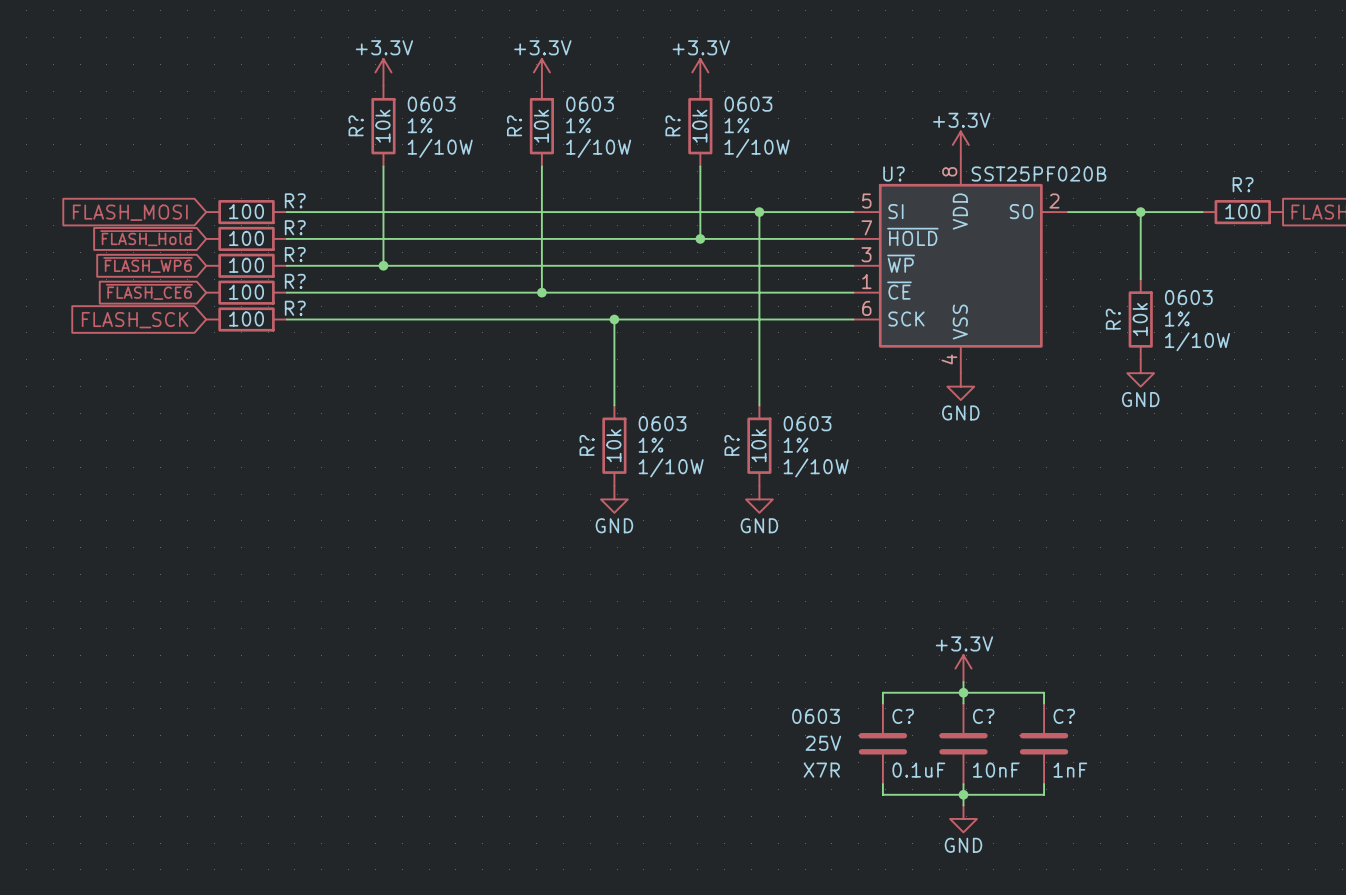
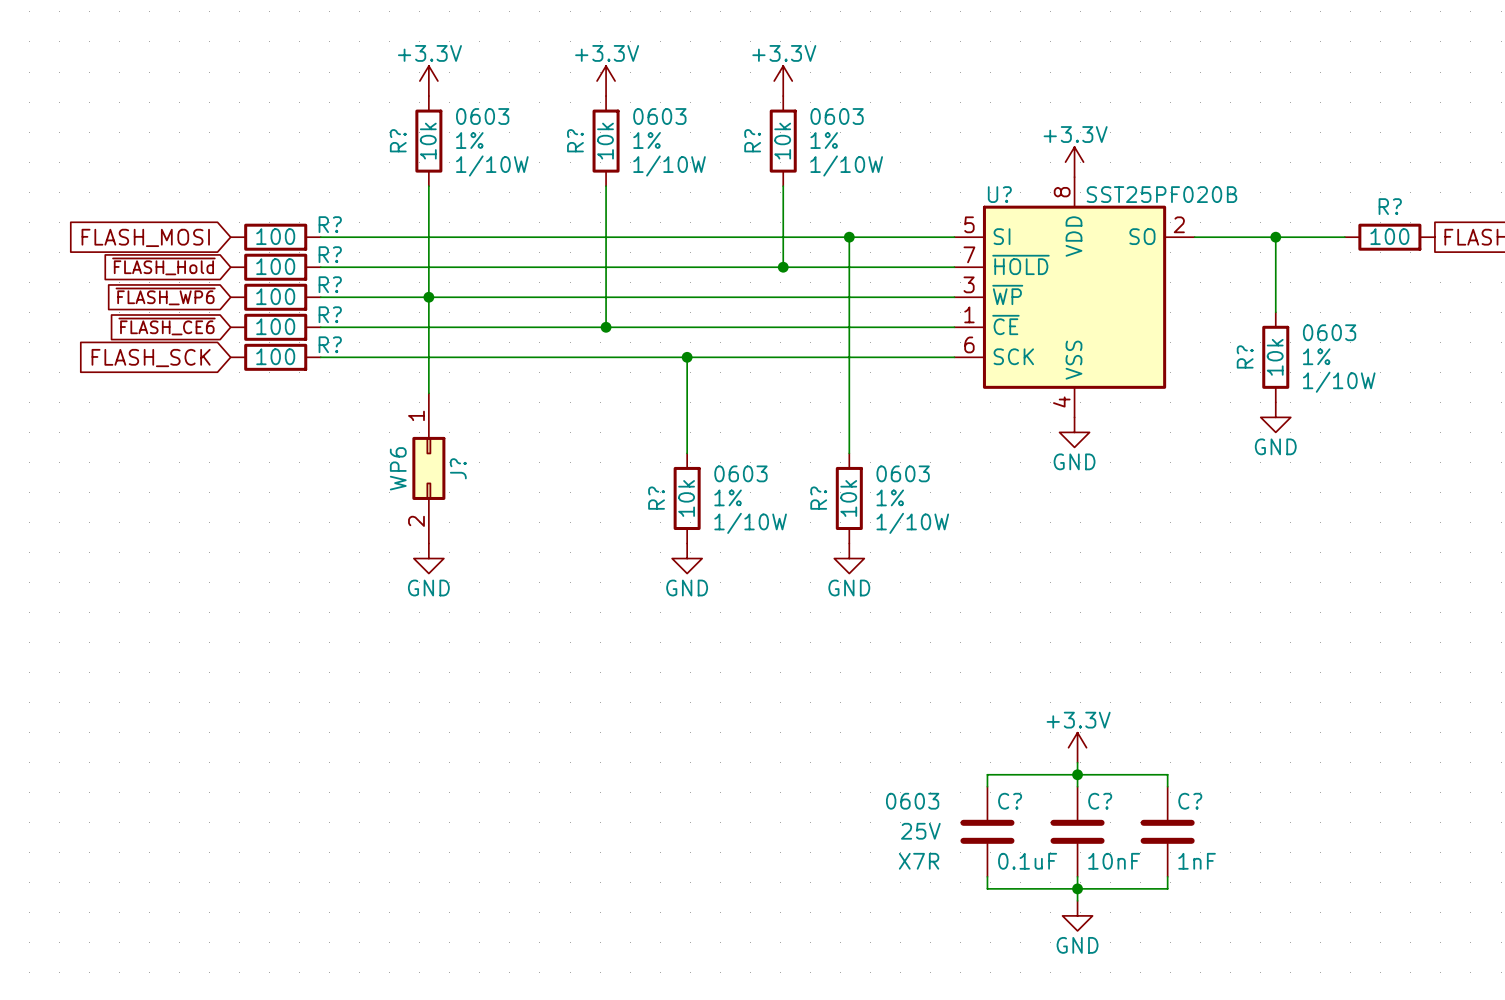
wire: none -> (428, 297) (428, 393)
J?: none -> WP6 (428, 468)
power symbol: none -> GND (428, 558)

